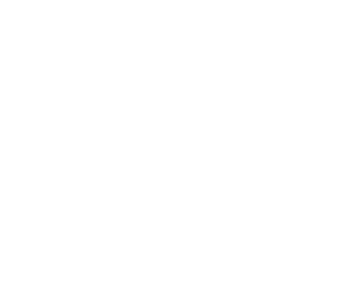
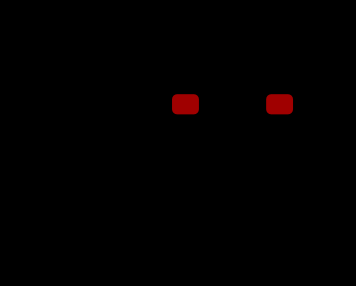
part: none -> (232, 104)

